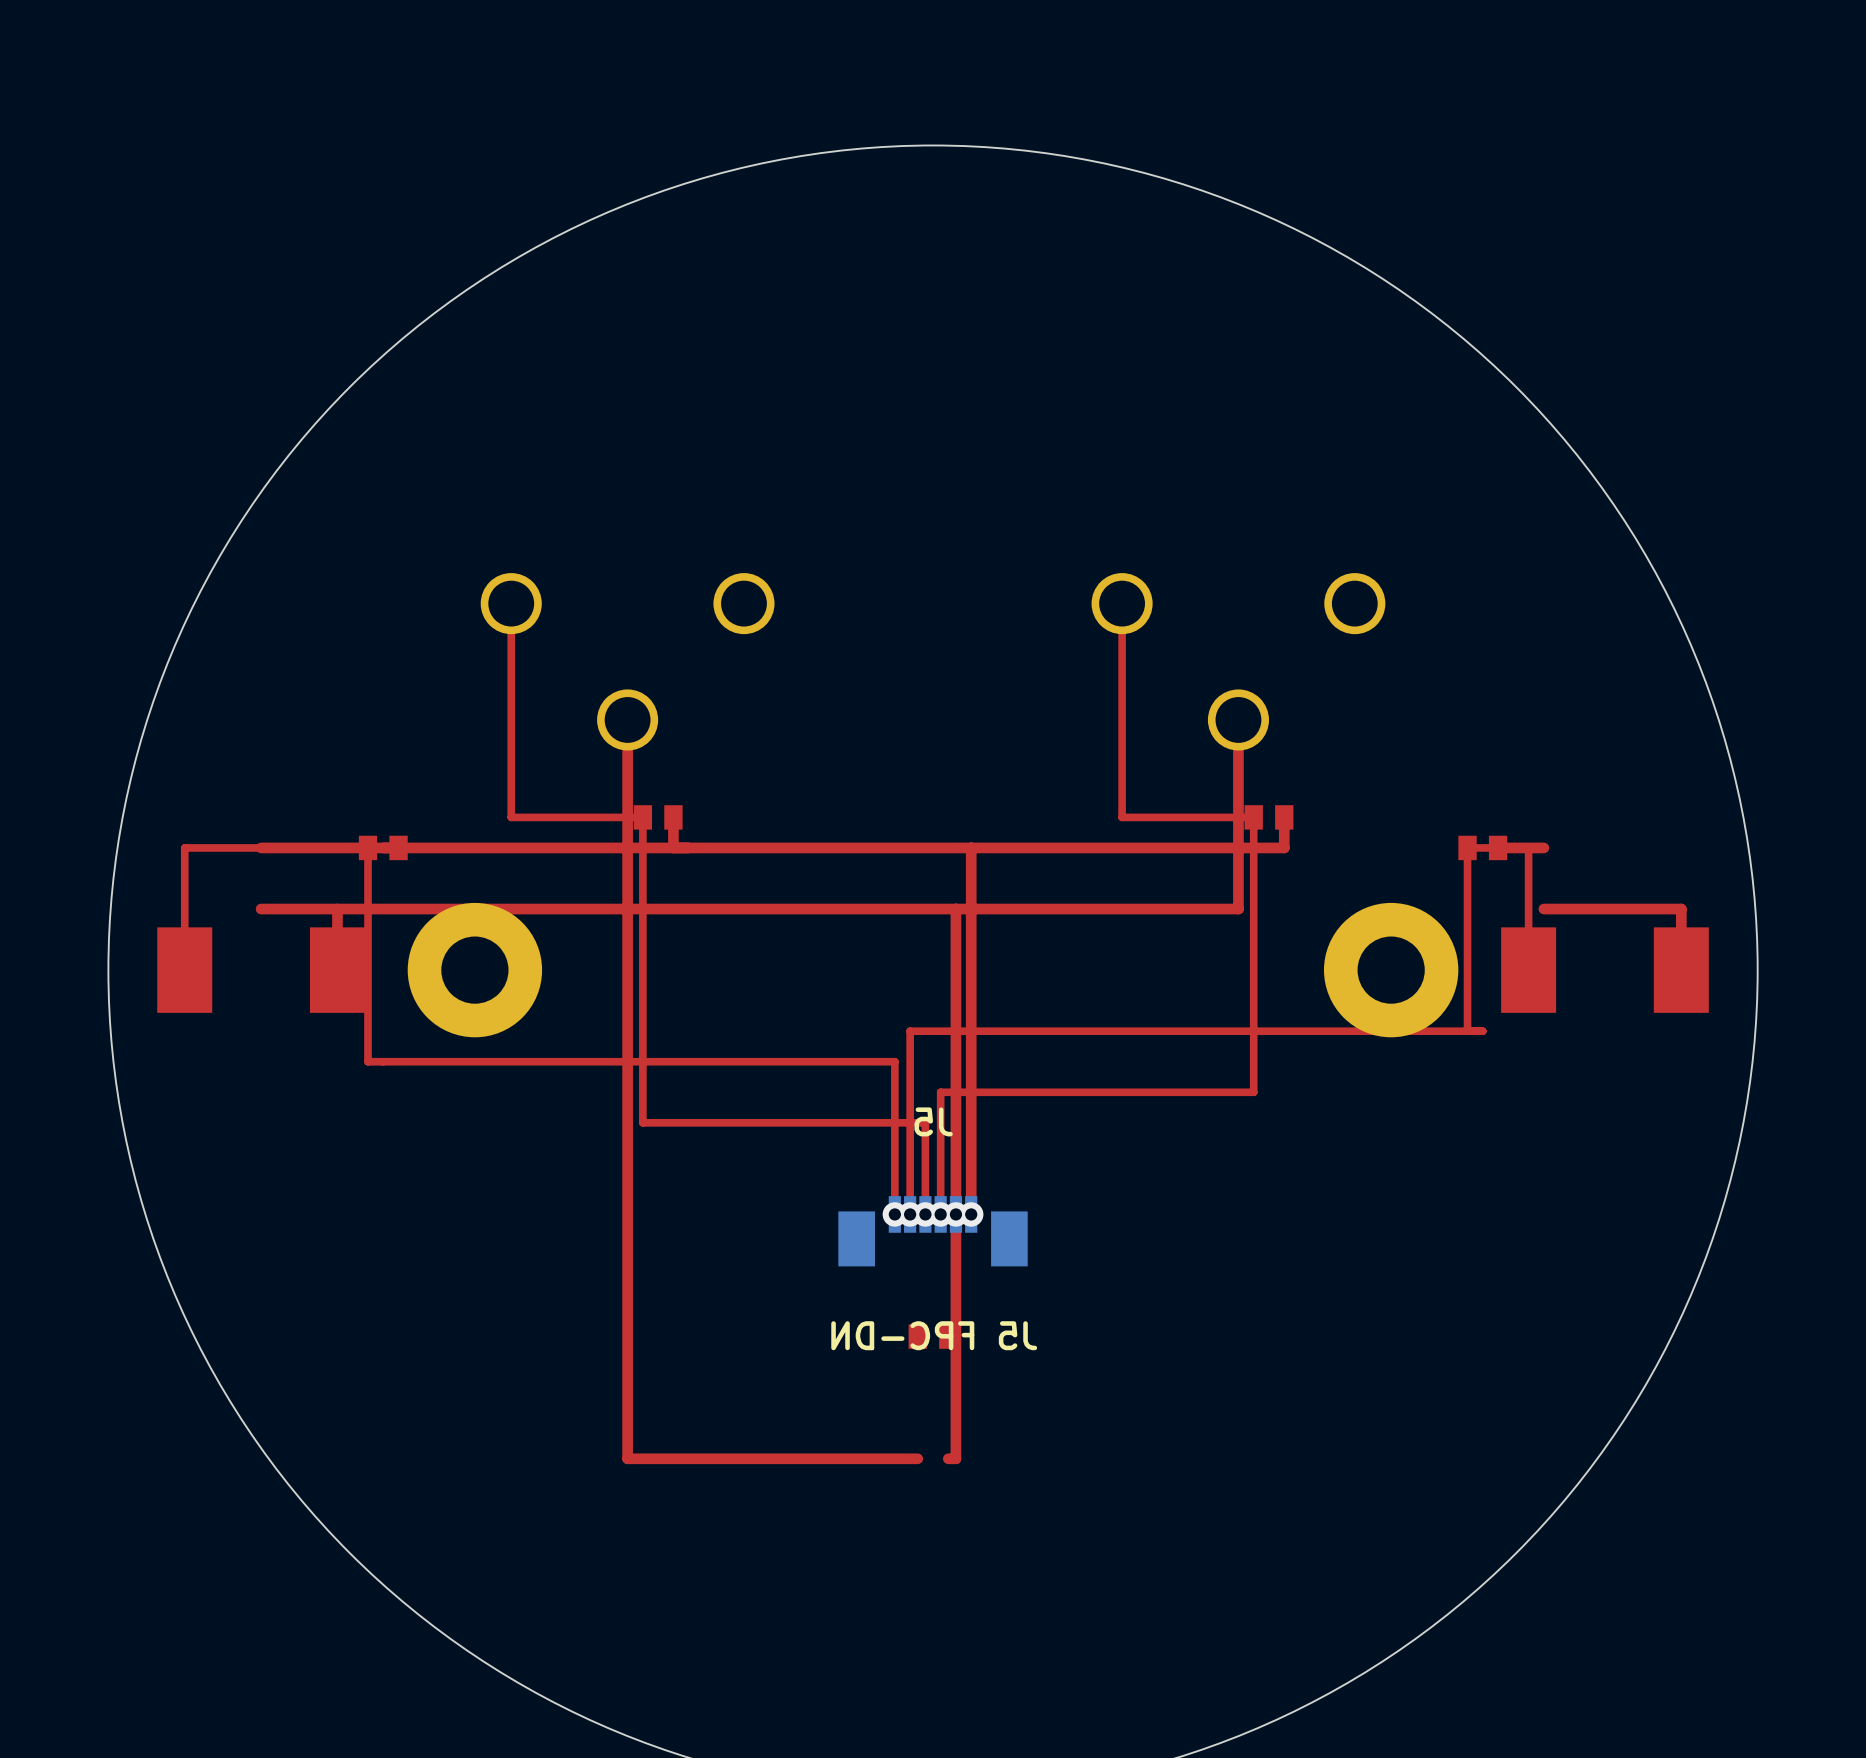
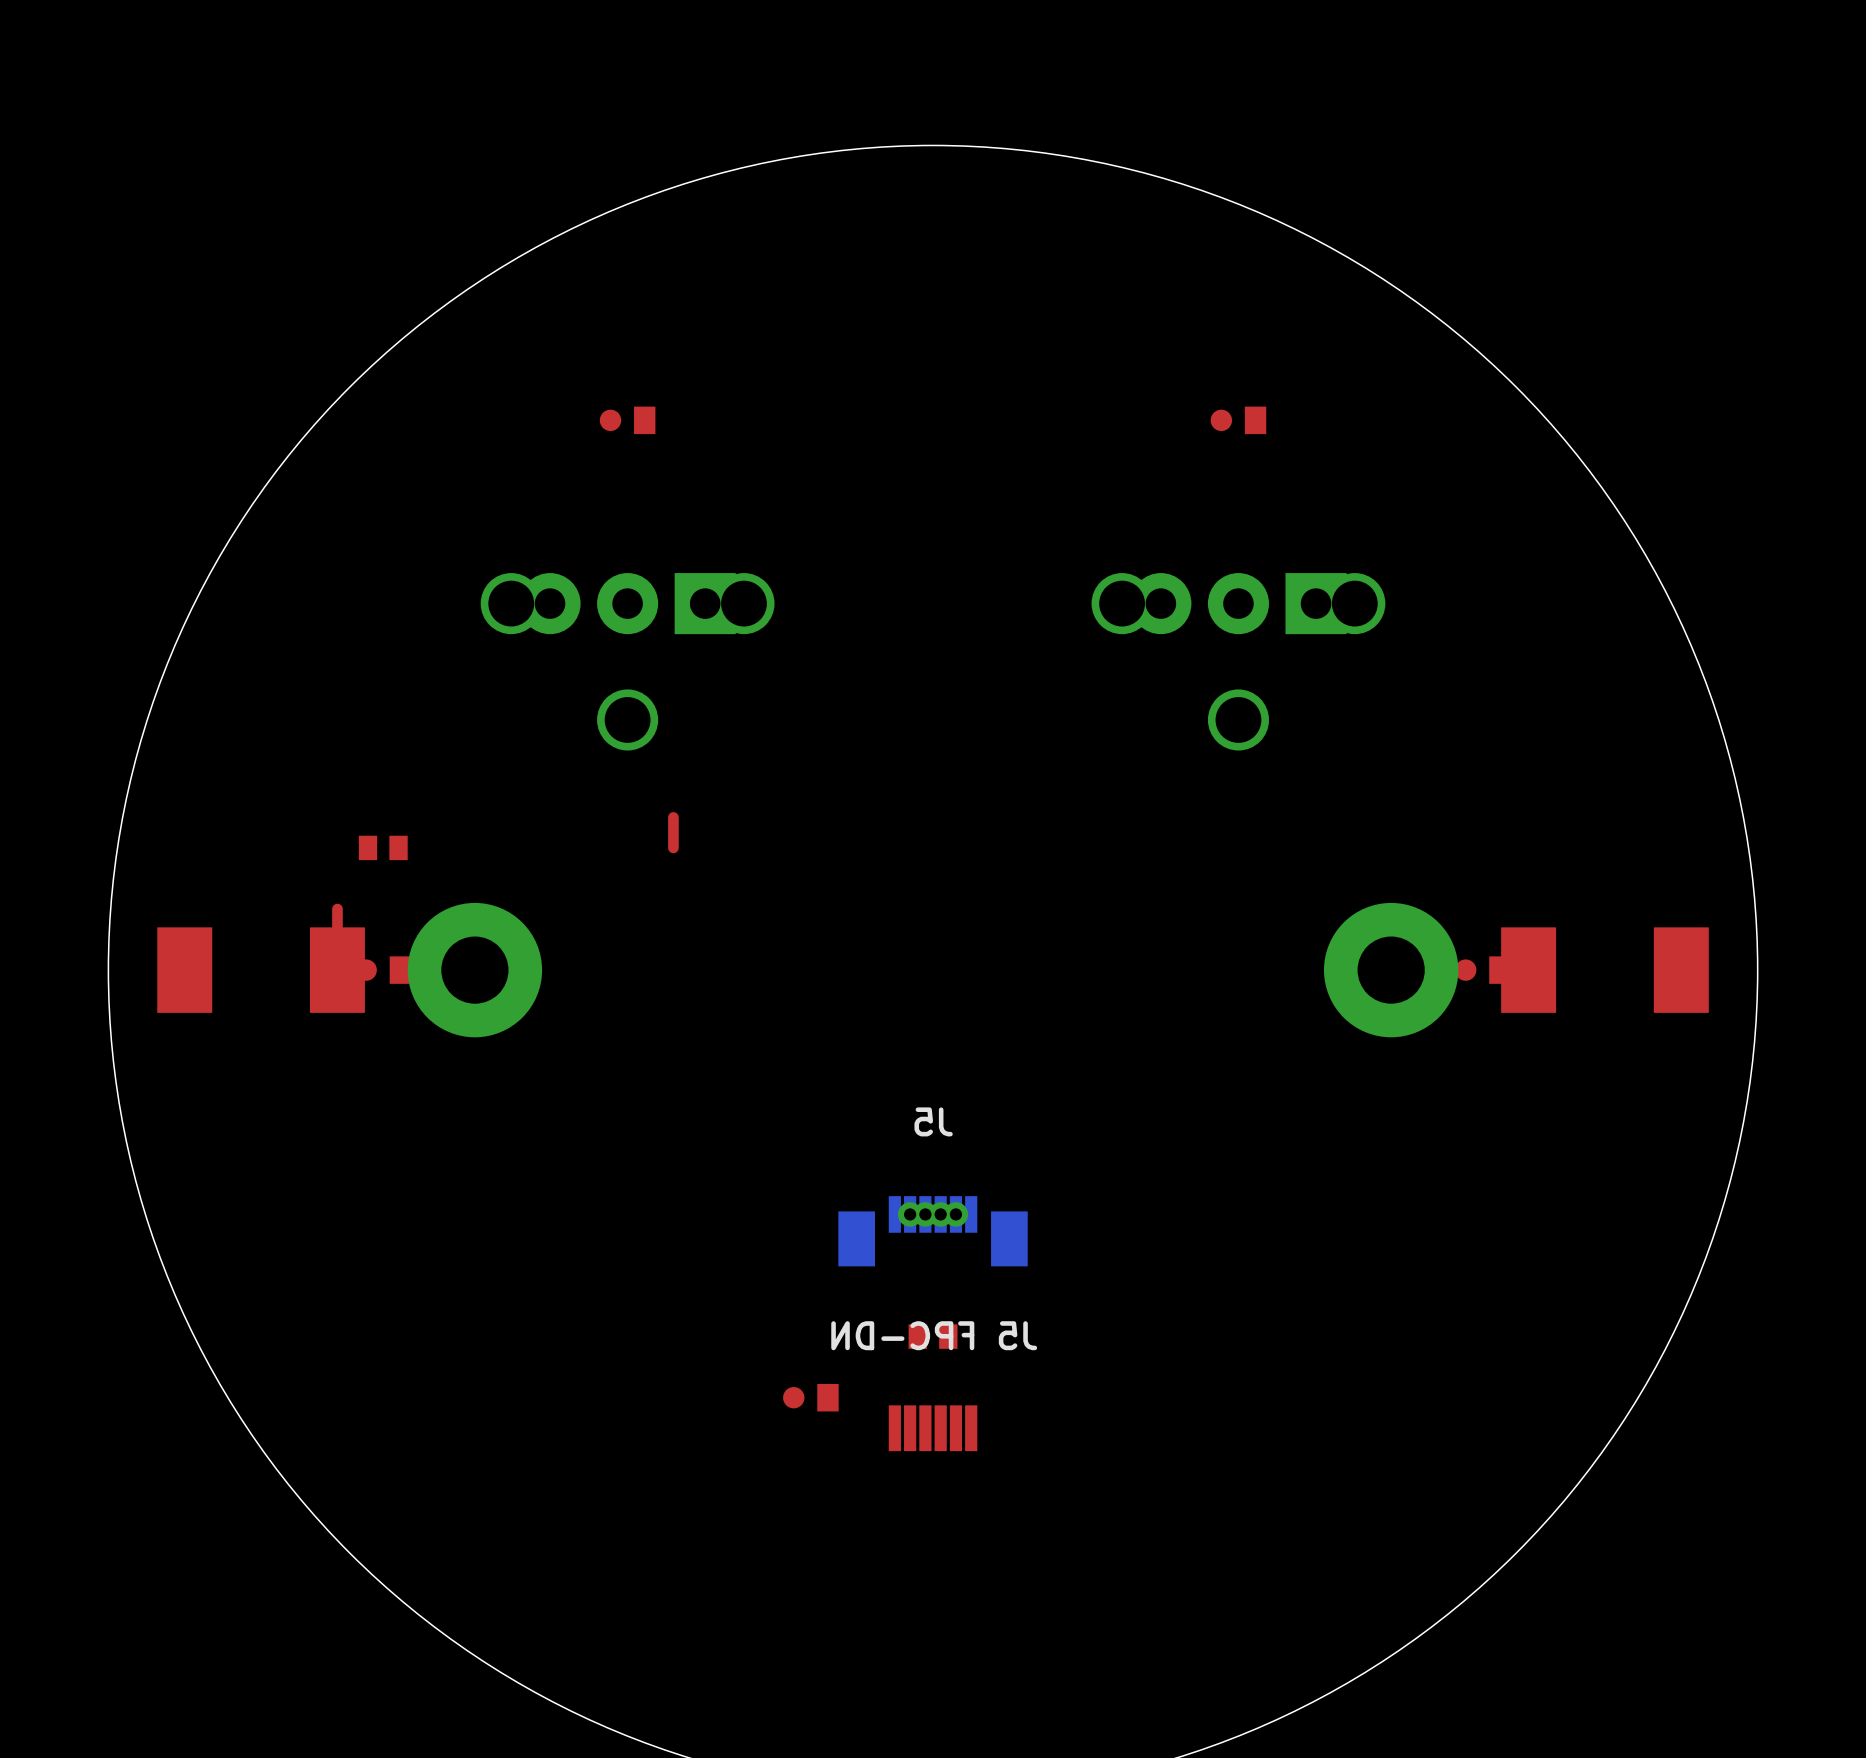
part: none -> (627, 420)
part: none -> (1238, 420)
top track: (511, 603) (511, 817) (642, 817) (642, 1122) (925, 1122) (925, 1214) -> none
part: none -> (627, 603)
top track: (1122, 603) (1122, 817) (1253, 817) (1253, 1092) (940, 1092) (940, 1214) -> none
part: none -> (1238, 603)
top track: (627, 719) (627, 1458) (917, 1458) -> none
top track: (1238, 719) (1238, 909) (261, 909) -> none
part: (658, 817) -> none
part: (1269, 817) -> none
top track: (1284, 817) (1284, 847) (261, 847) -> none
top track: (971, 847) (971, 1214) -> none
part: (1482, 847) -> none
top track: (1543, 847) (1498, 847) -> none
top track: (955, 909) (955, 1458) (948, 1458) -> none
top track: (1543, 909) (1681, 909) (1681, 970) -> none
top track: (184, 970) (184, 847) (368, 847) (368, 1061) (894, 1061) (894, 1214) -> none
part: none -> (383, 970)
part: none -> (1482, 970)
top track: (1528, 970) (1528, 847) (1467, 847) (1467, 1031) -> none
top track: (1482, 1031) (910, 1031) (910, 1214) -> none
via: (894, 1214) -> none
via: (971, 1214) -> none
part: none -> (810, 1397)
part: none -> (933, 1428)

